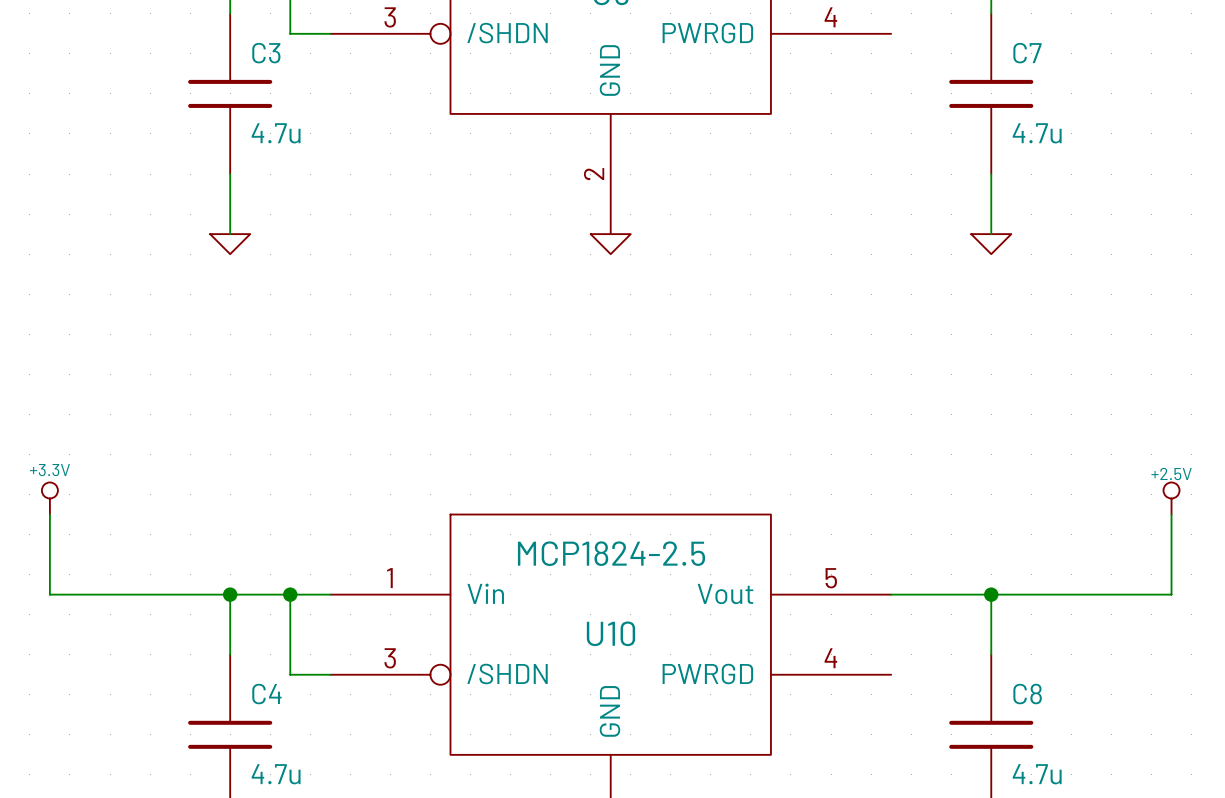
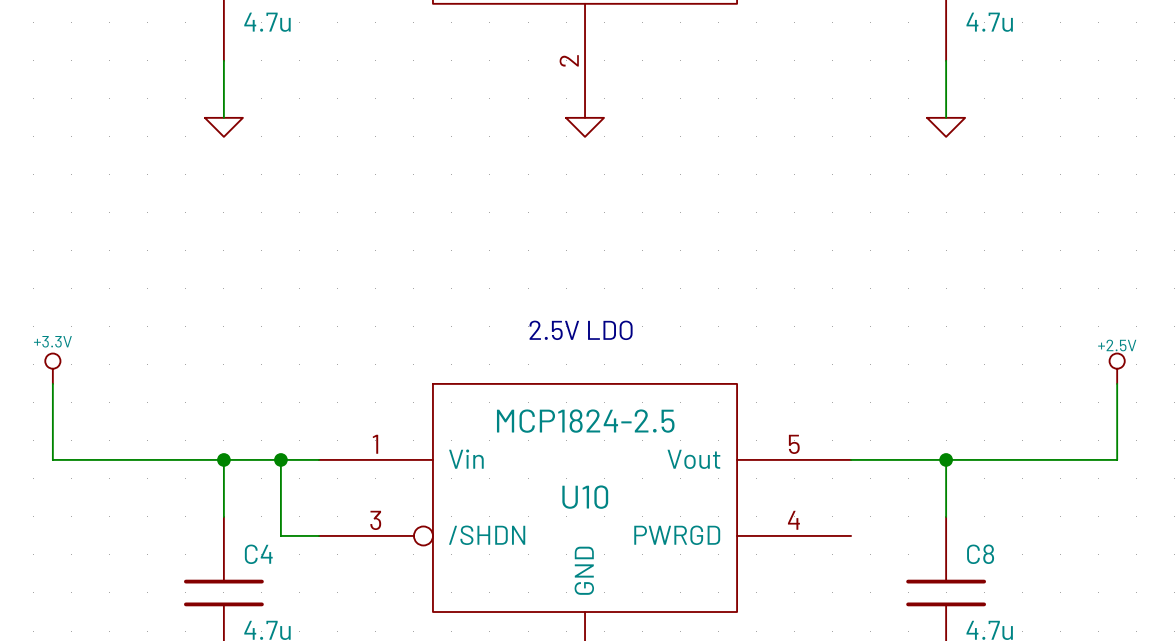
text: none -> 2.5V LDO (581, 330)

